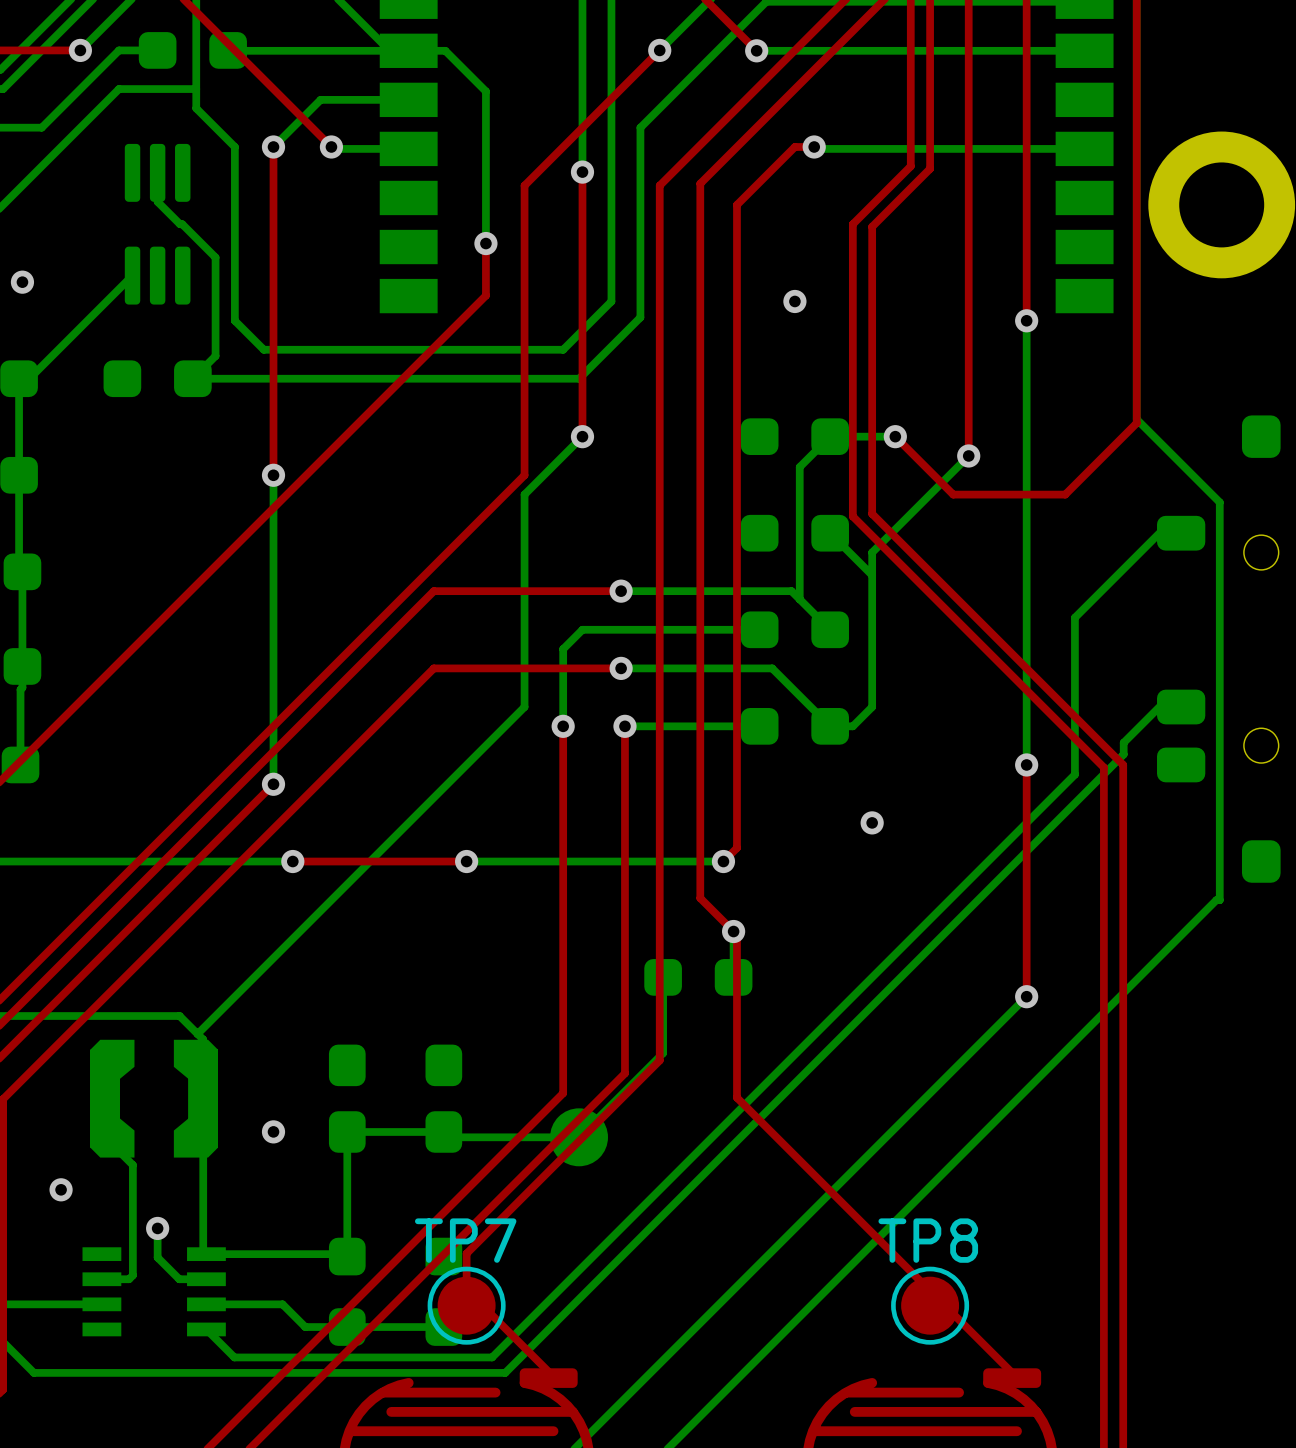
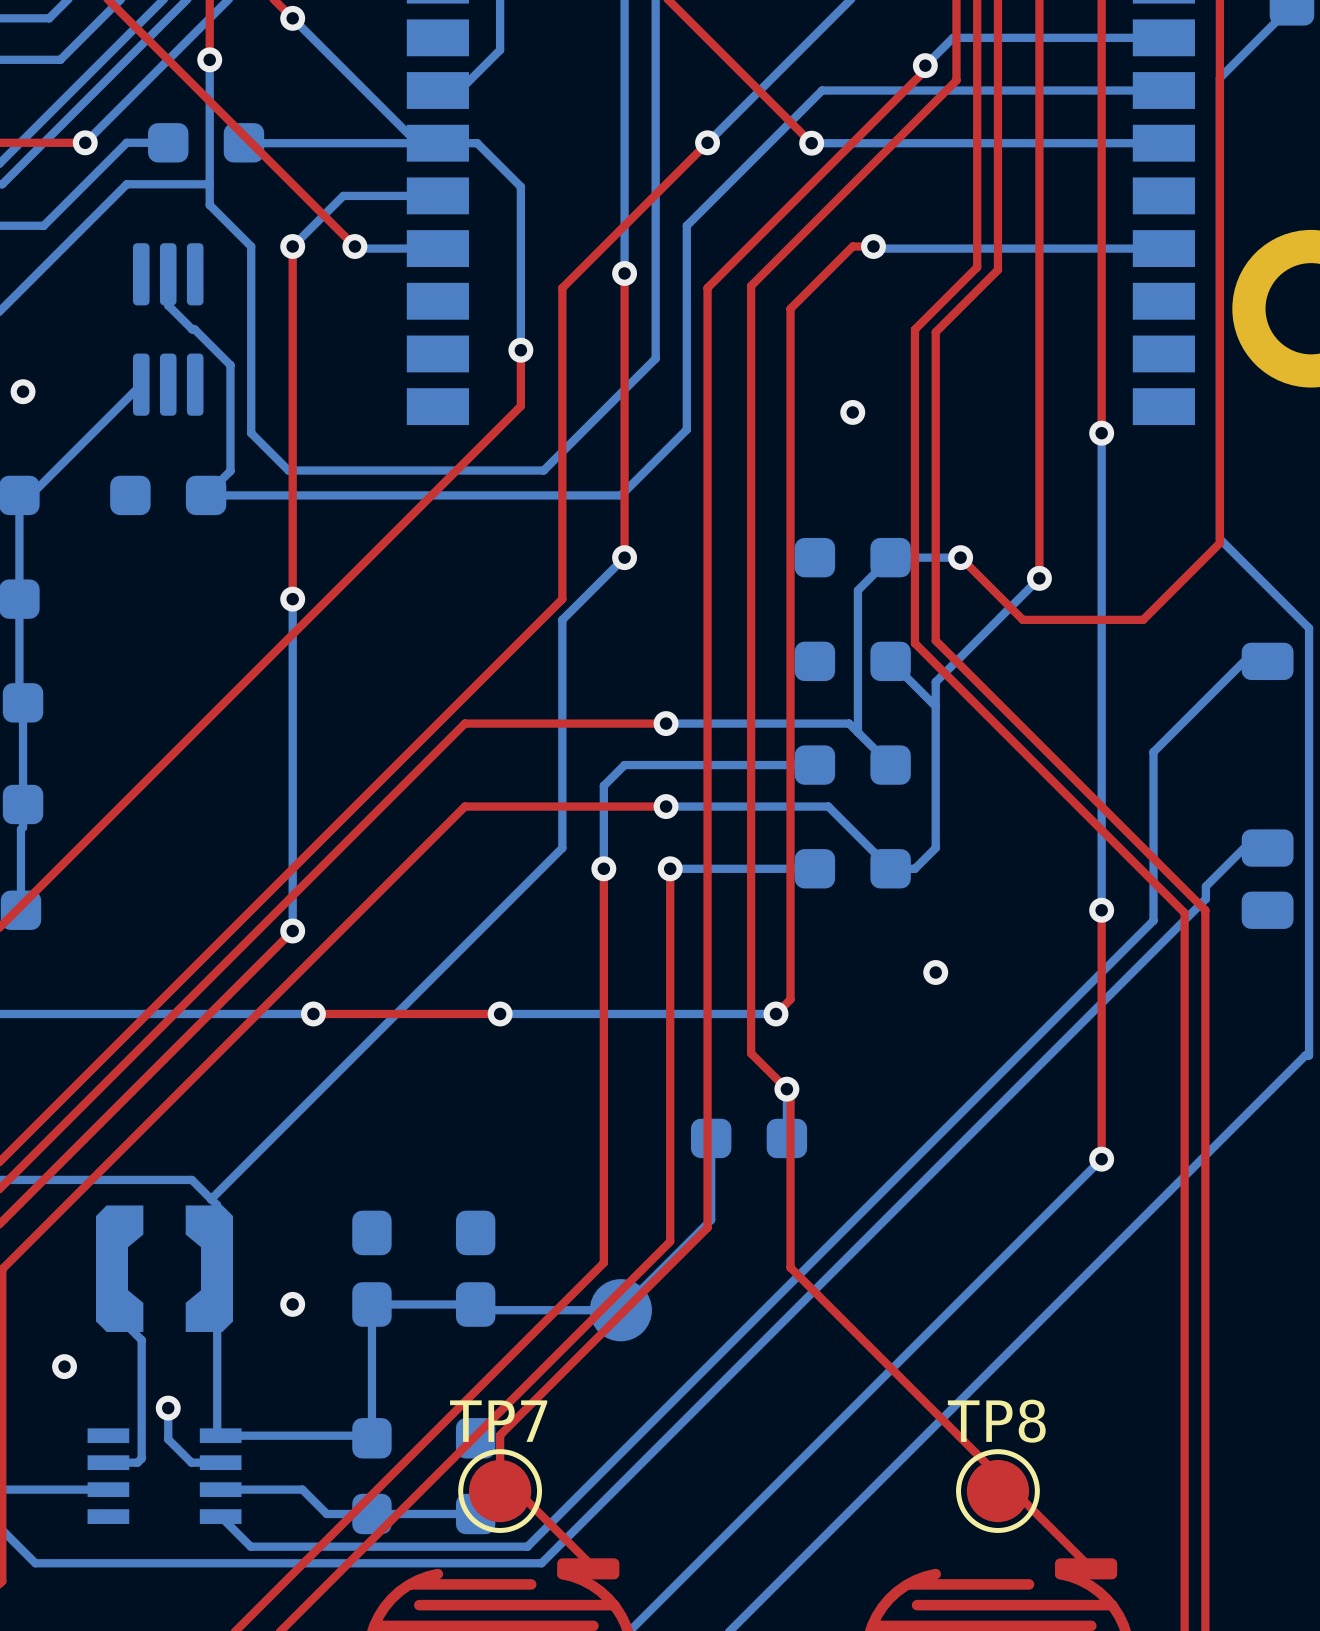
bottom track: (611, 251) (611, 301) (563, 349) (263, 349) -> (655, 358) (543, 470) (288, 470) (282, 464)

